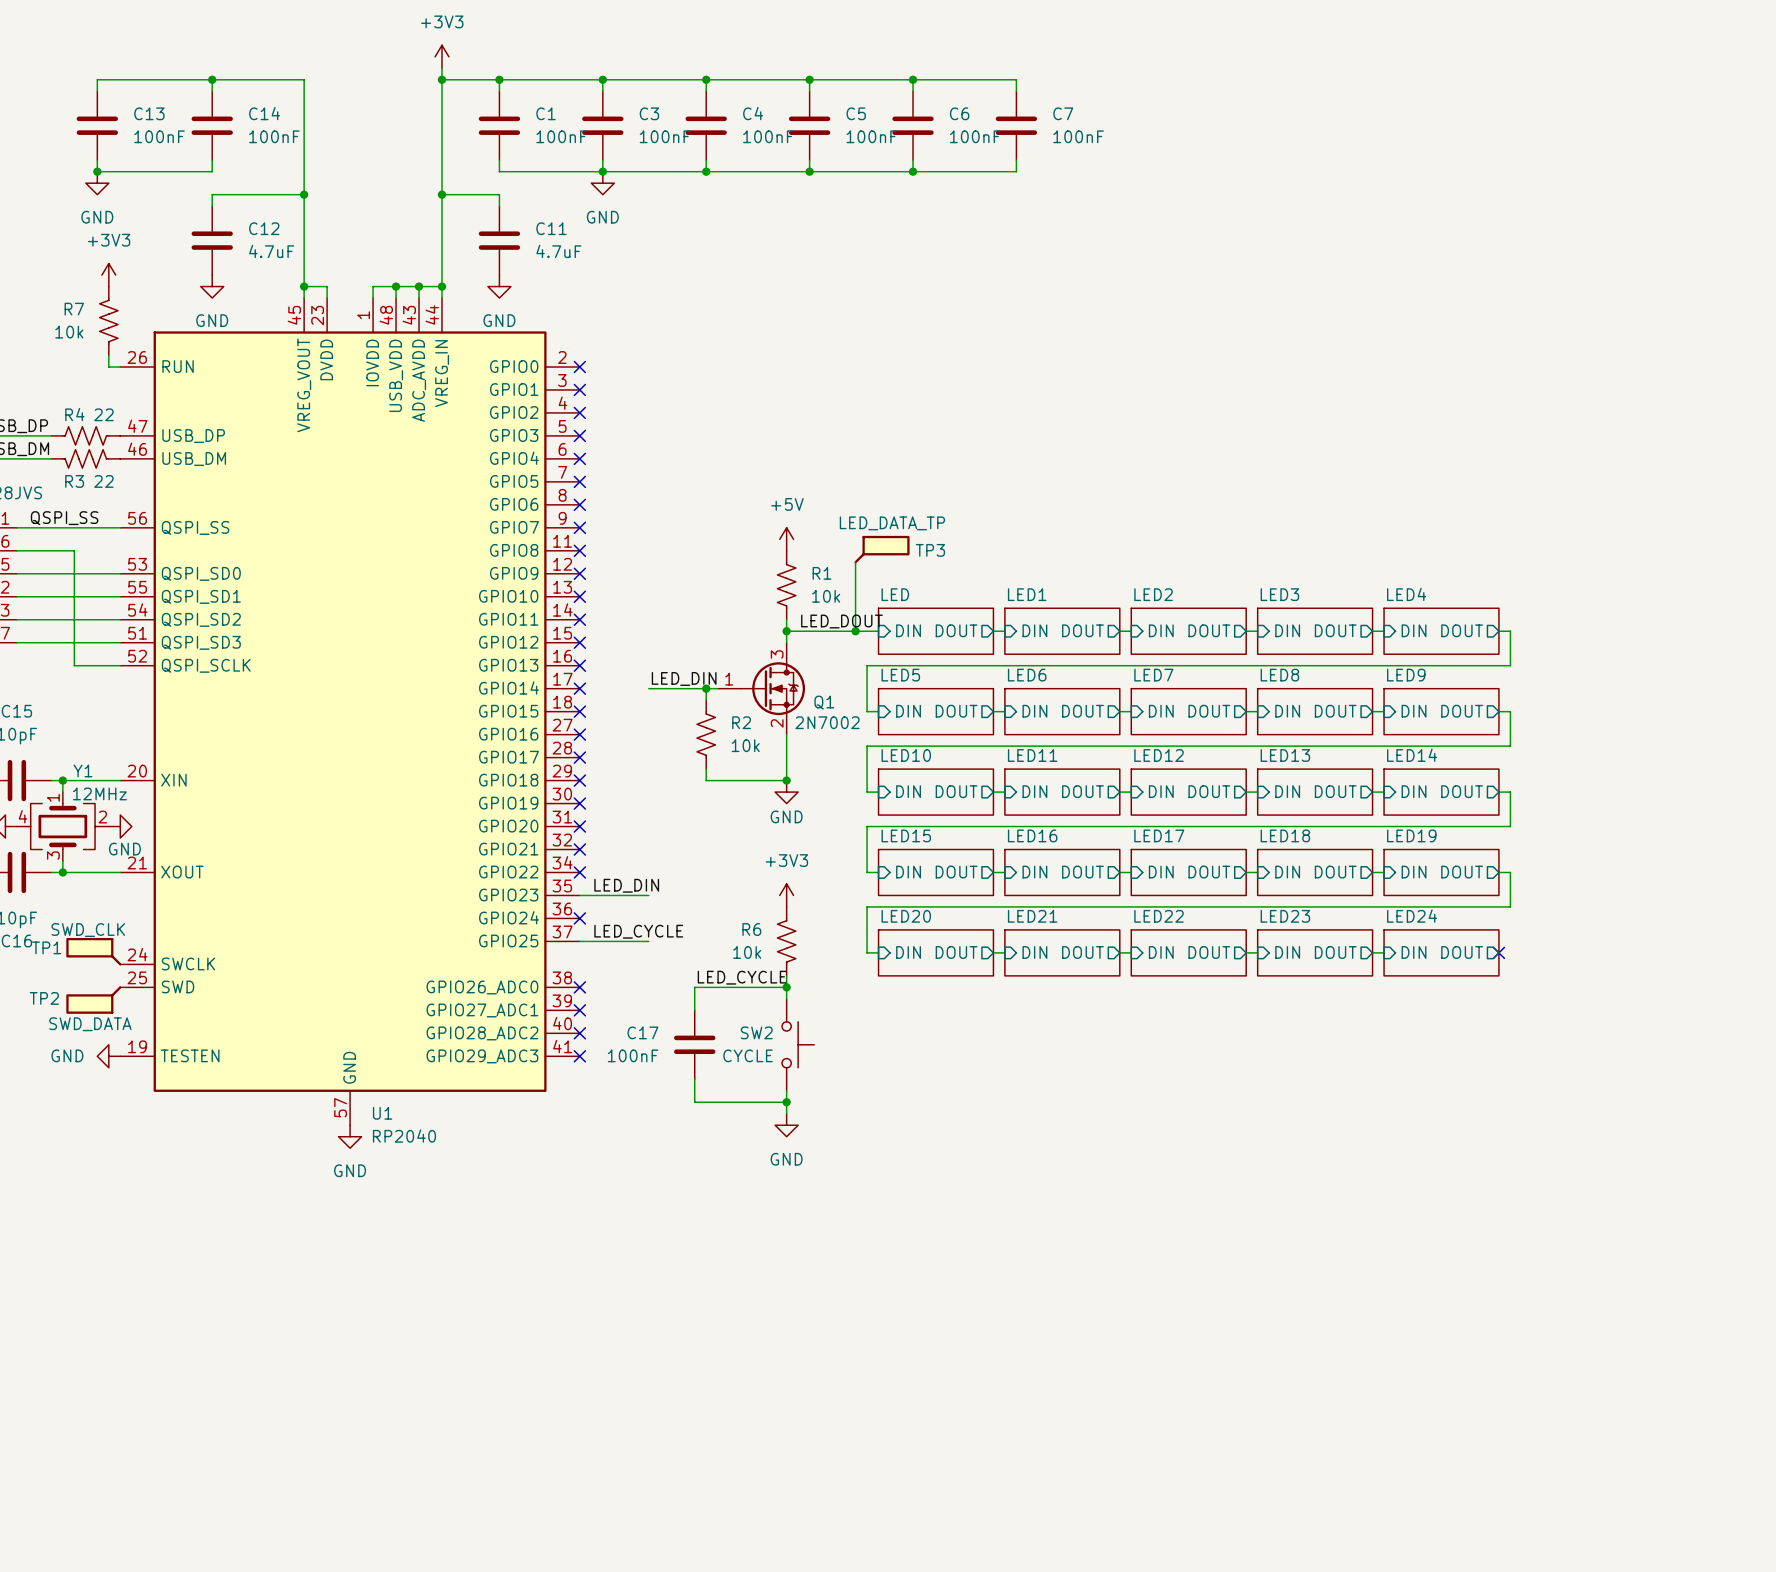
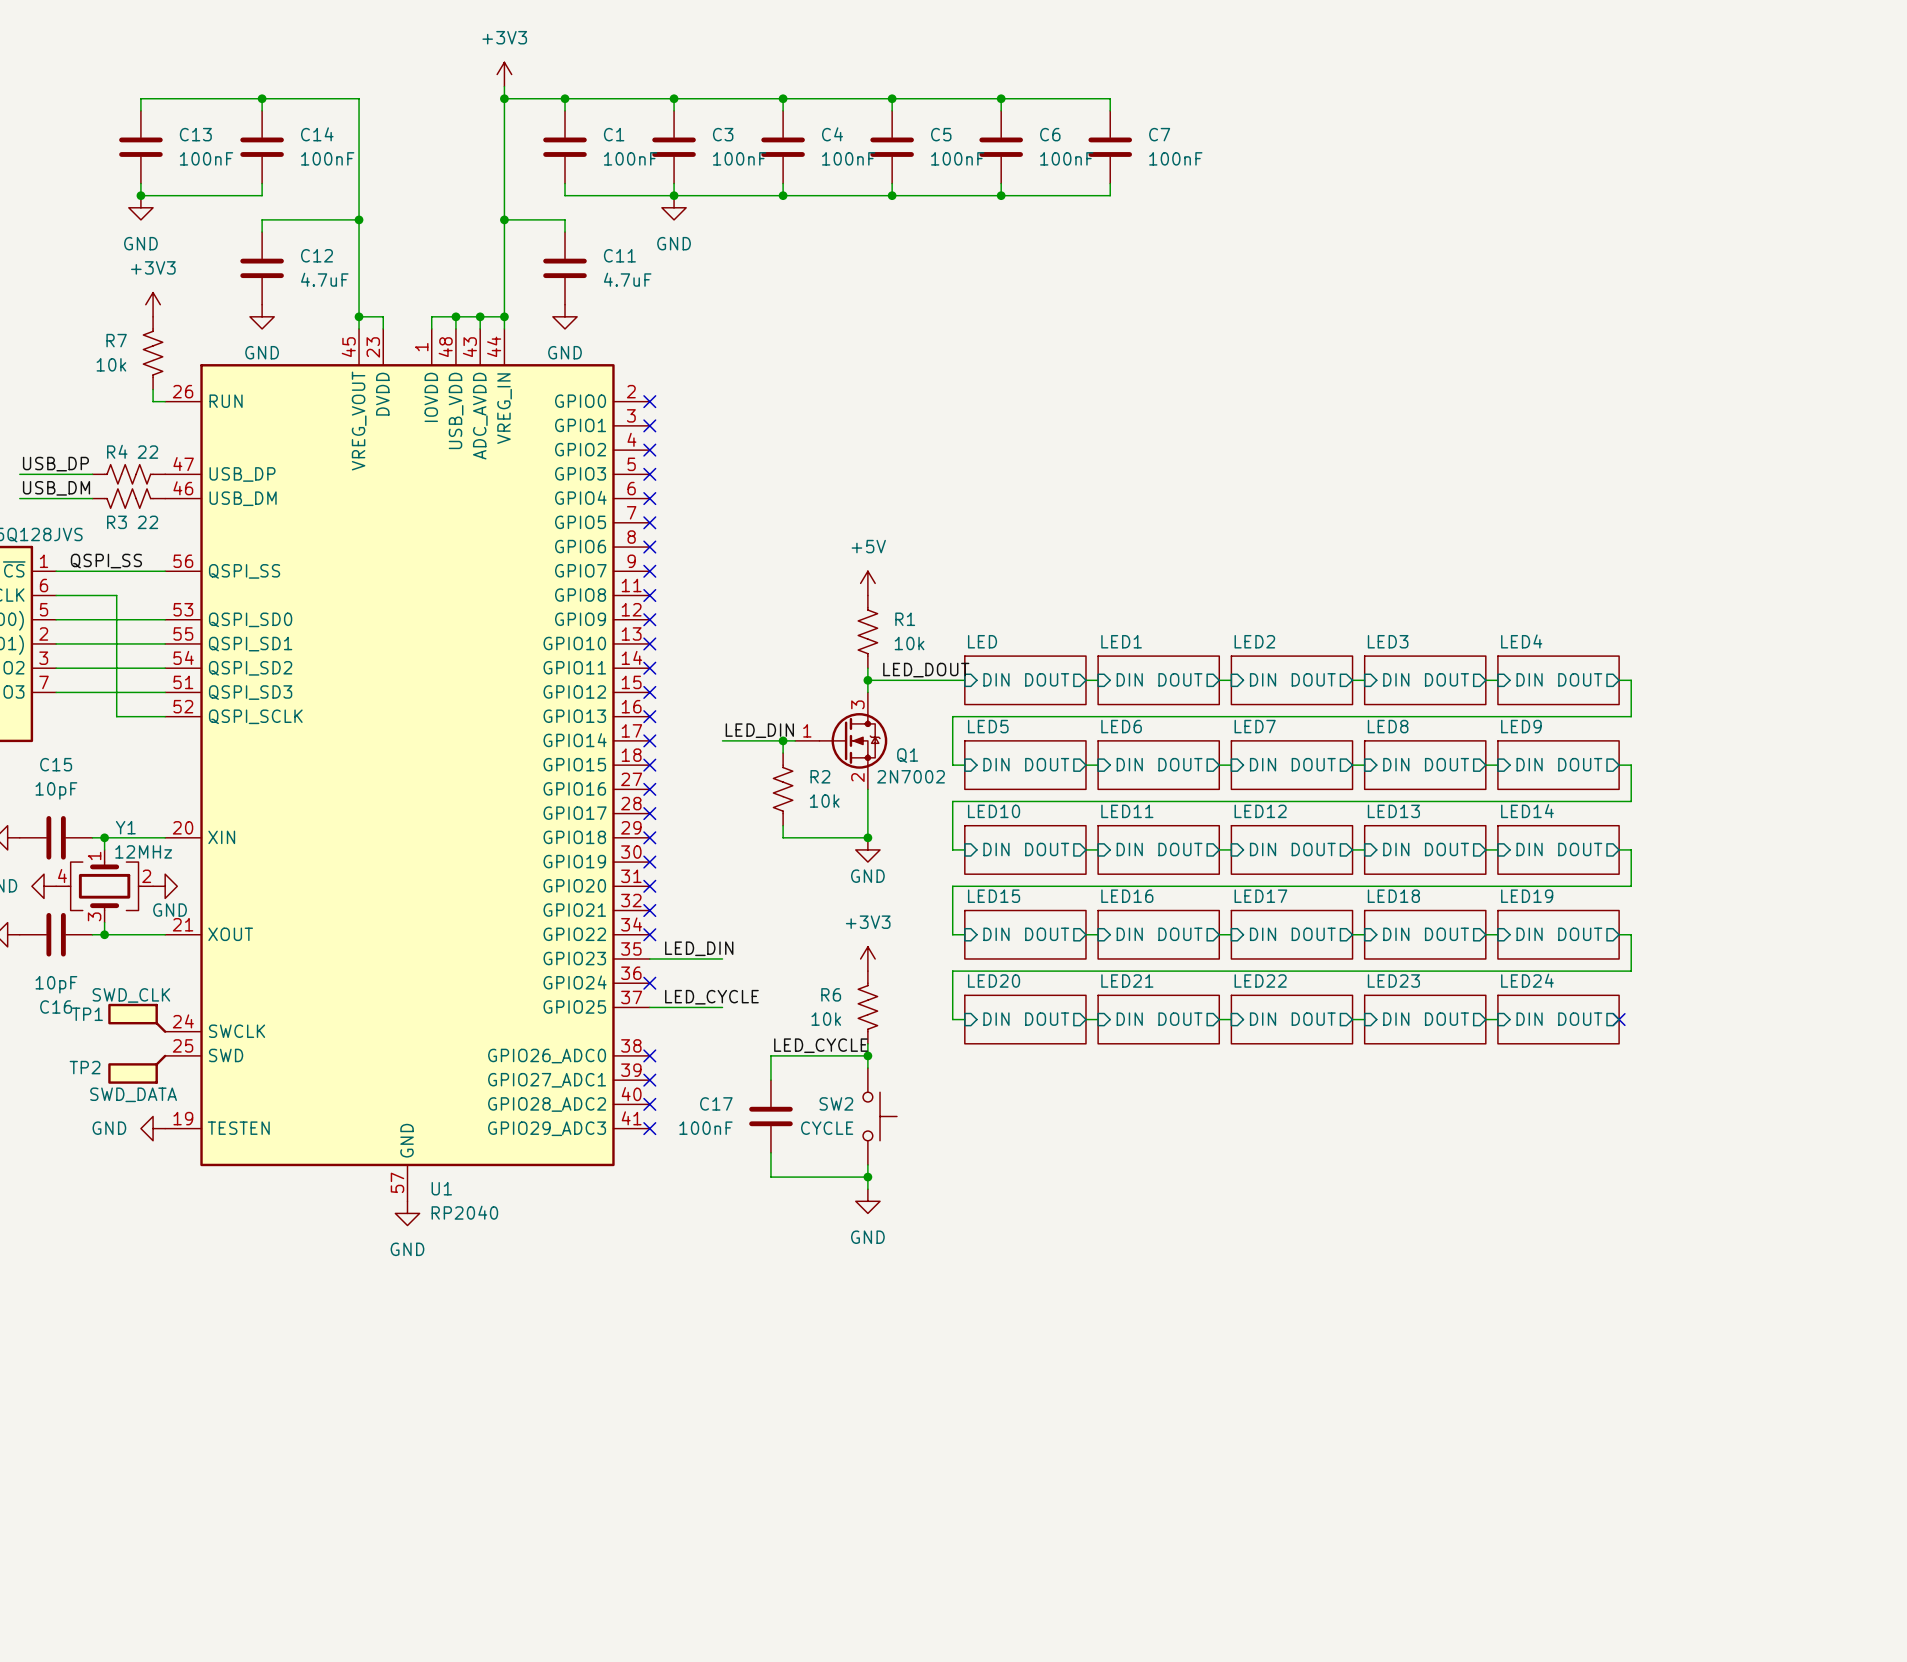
TP3: LED_DATA_TP (881, 549) -> none
wire: (855, 562) (855, 631) -> none
junction: (855, 631) -> none

